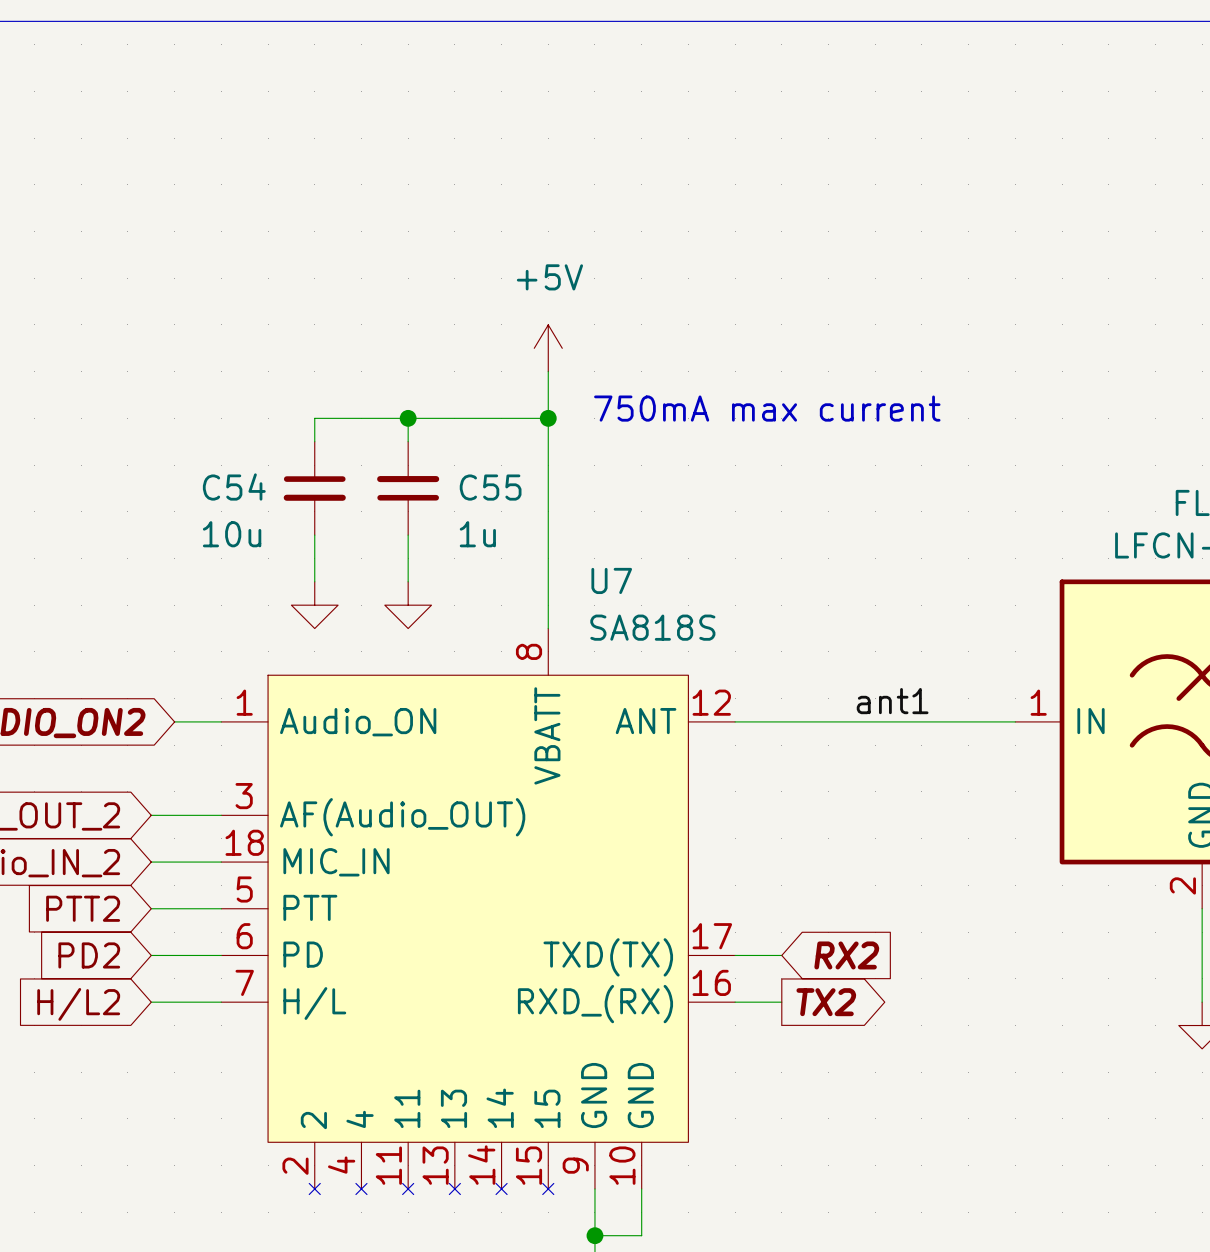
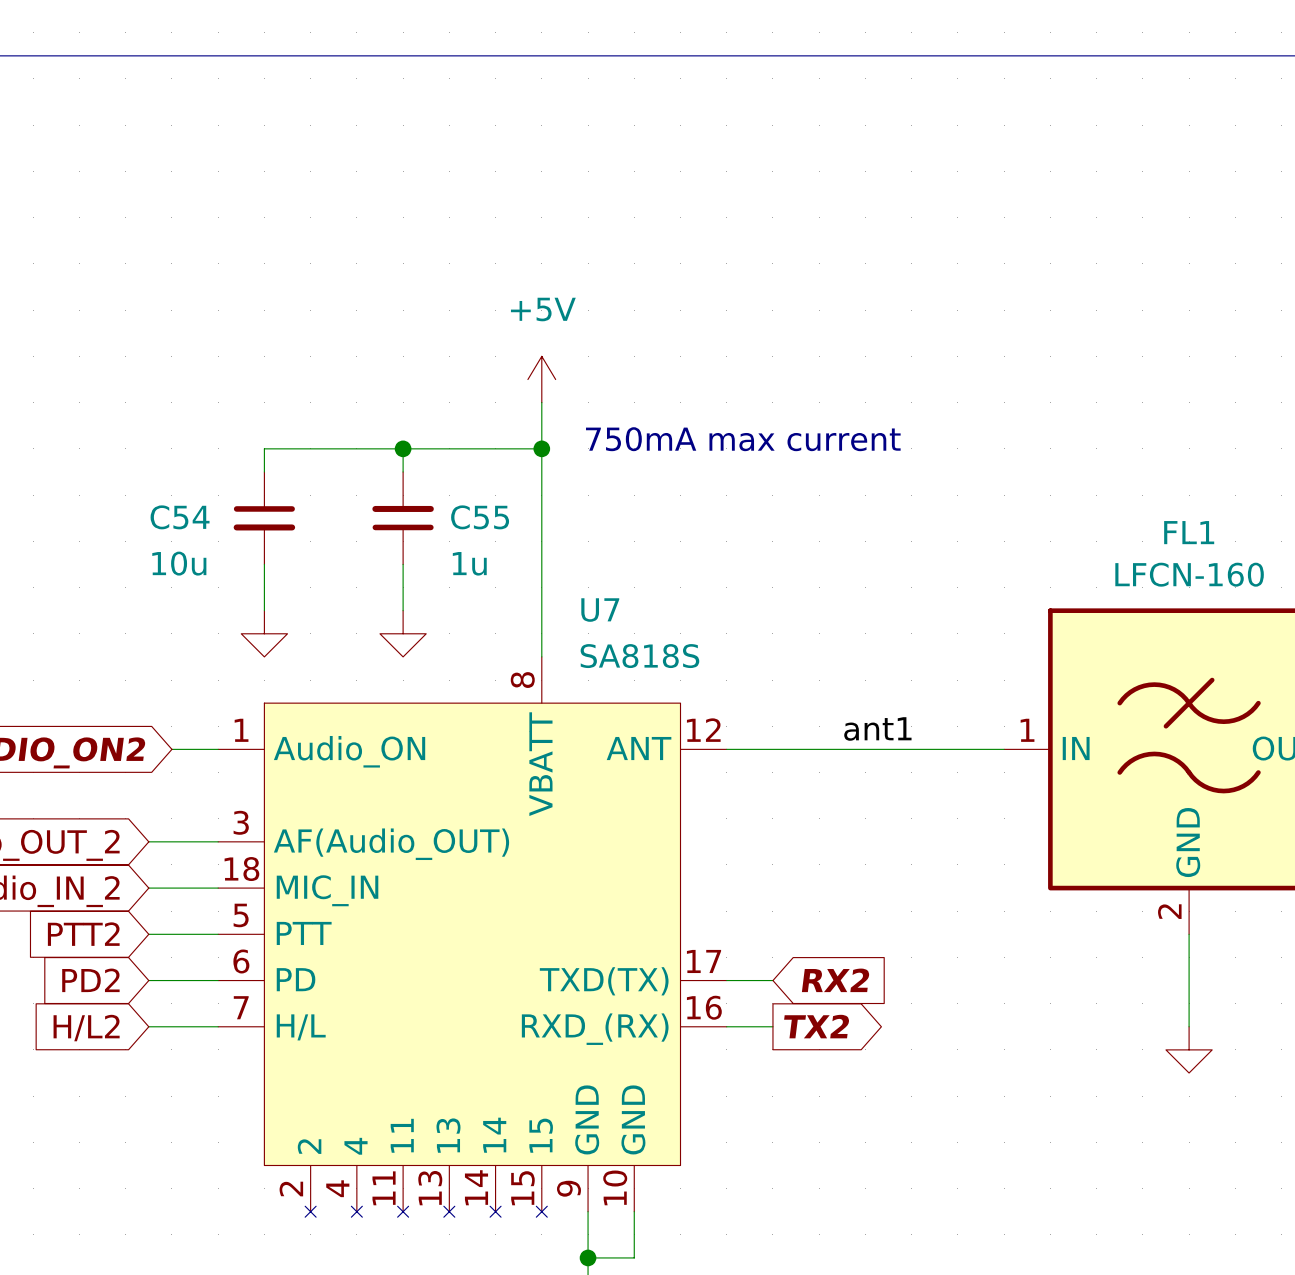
wire: (314, 418) (314, 441) -> (310, 448) (264, 448) (264, 471)
C54 position: (314, 488) -> (264, 518)
wire: (314, 535) (314, 581) -> (264, 564) (264, 610)
power symbol position: (314, 605) -> (264, 633)

